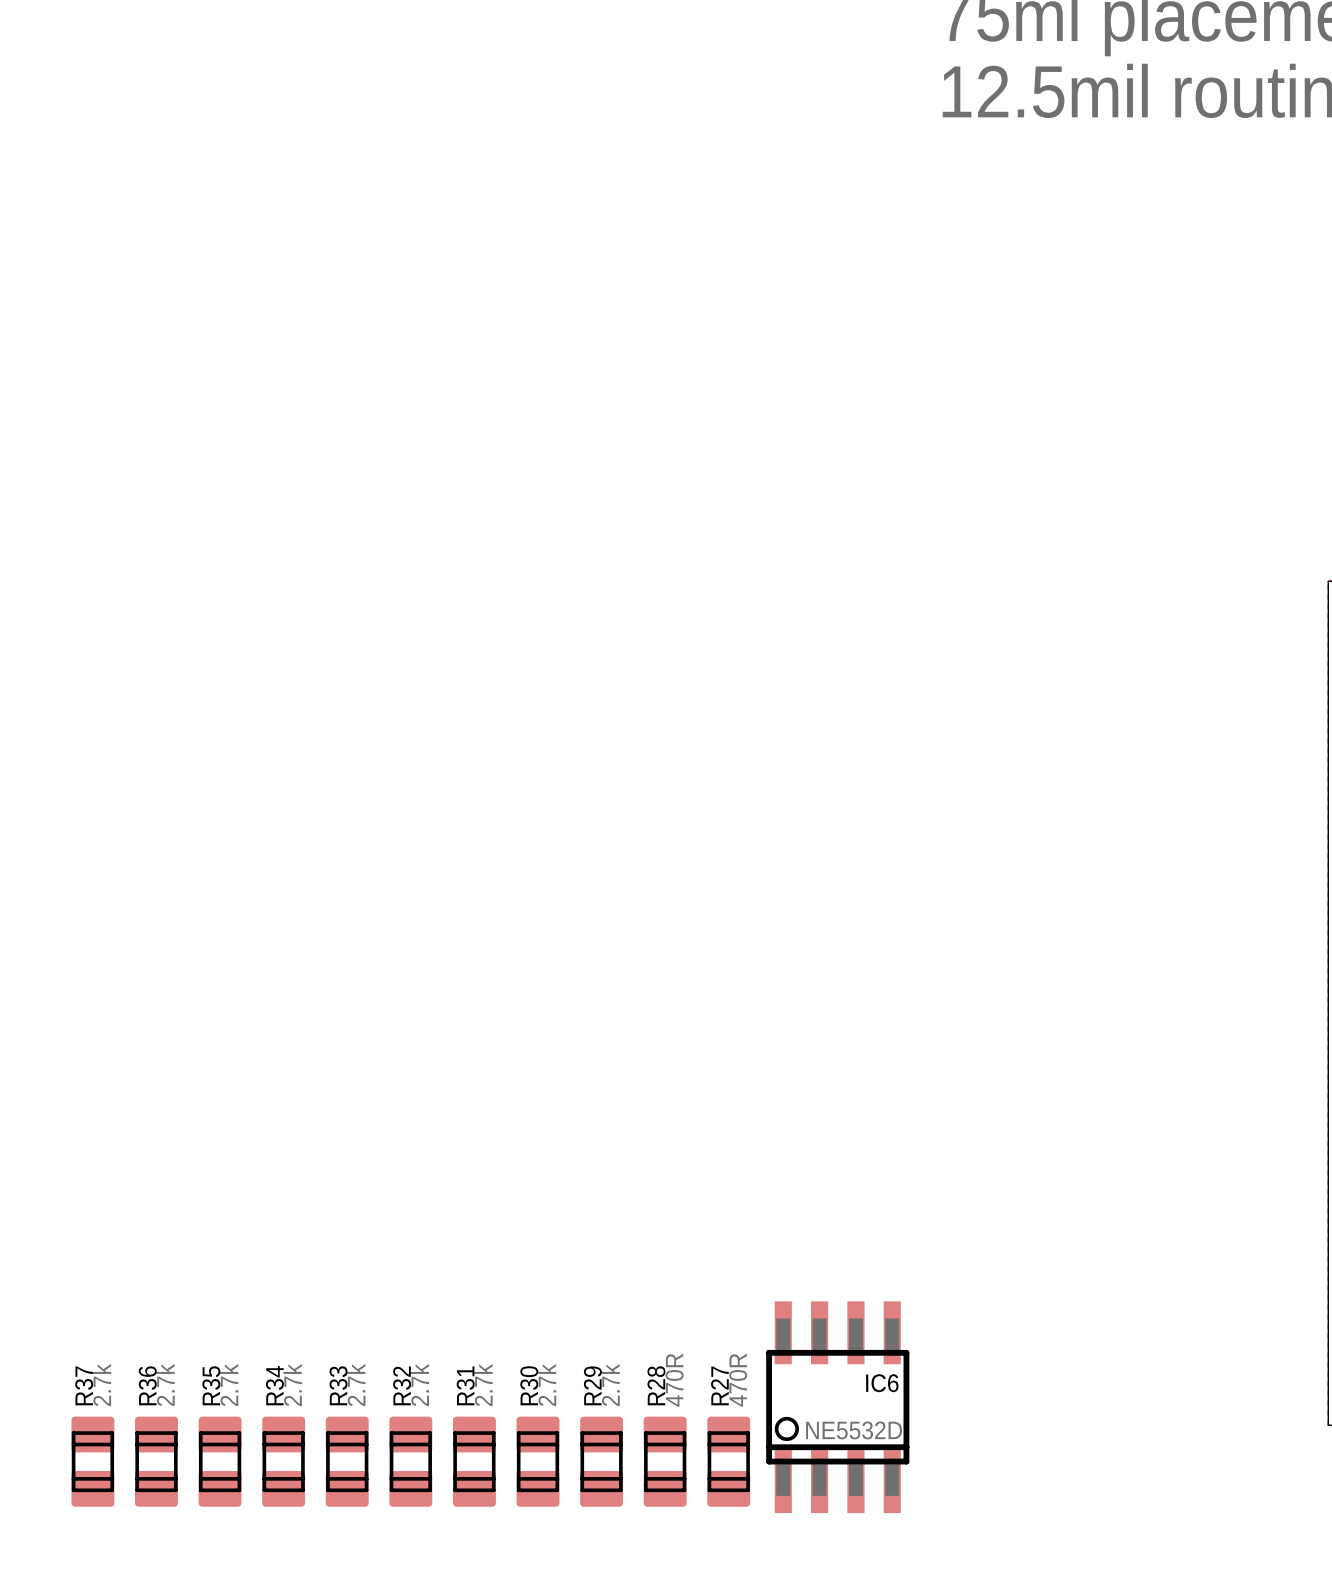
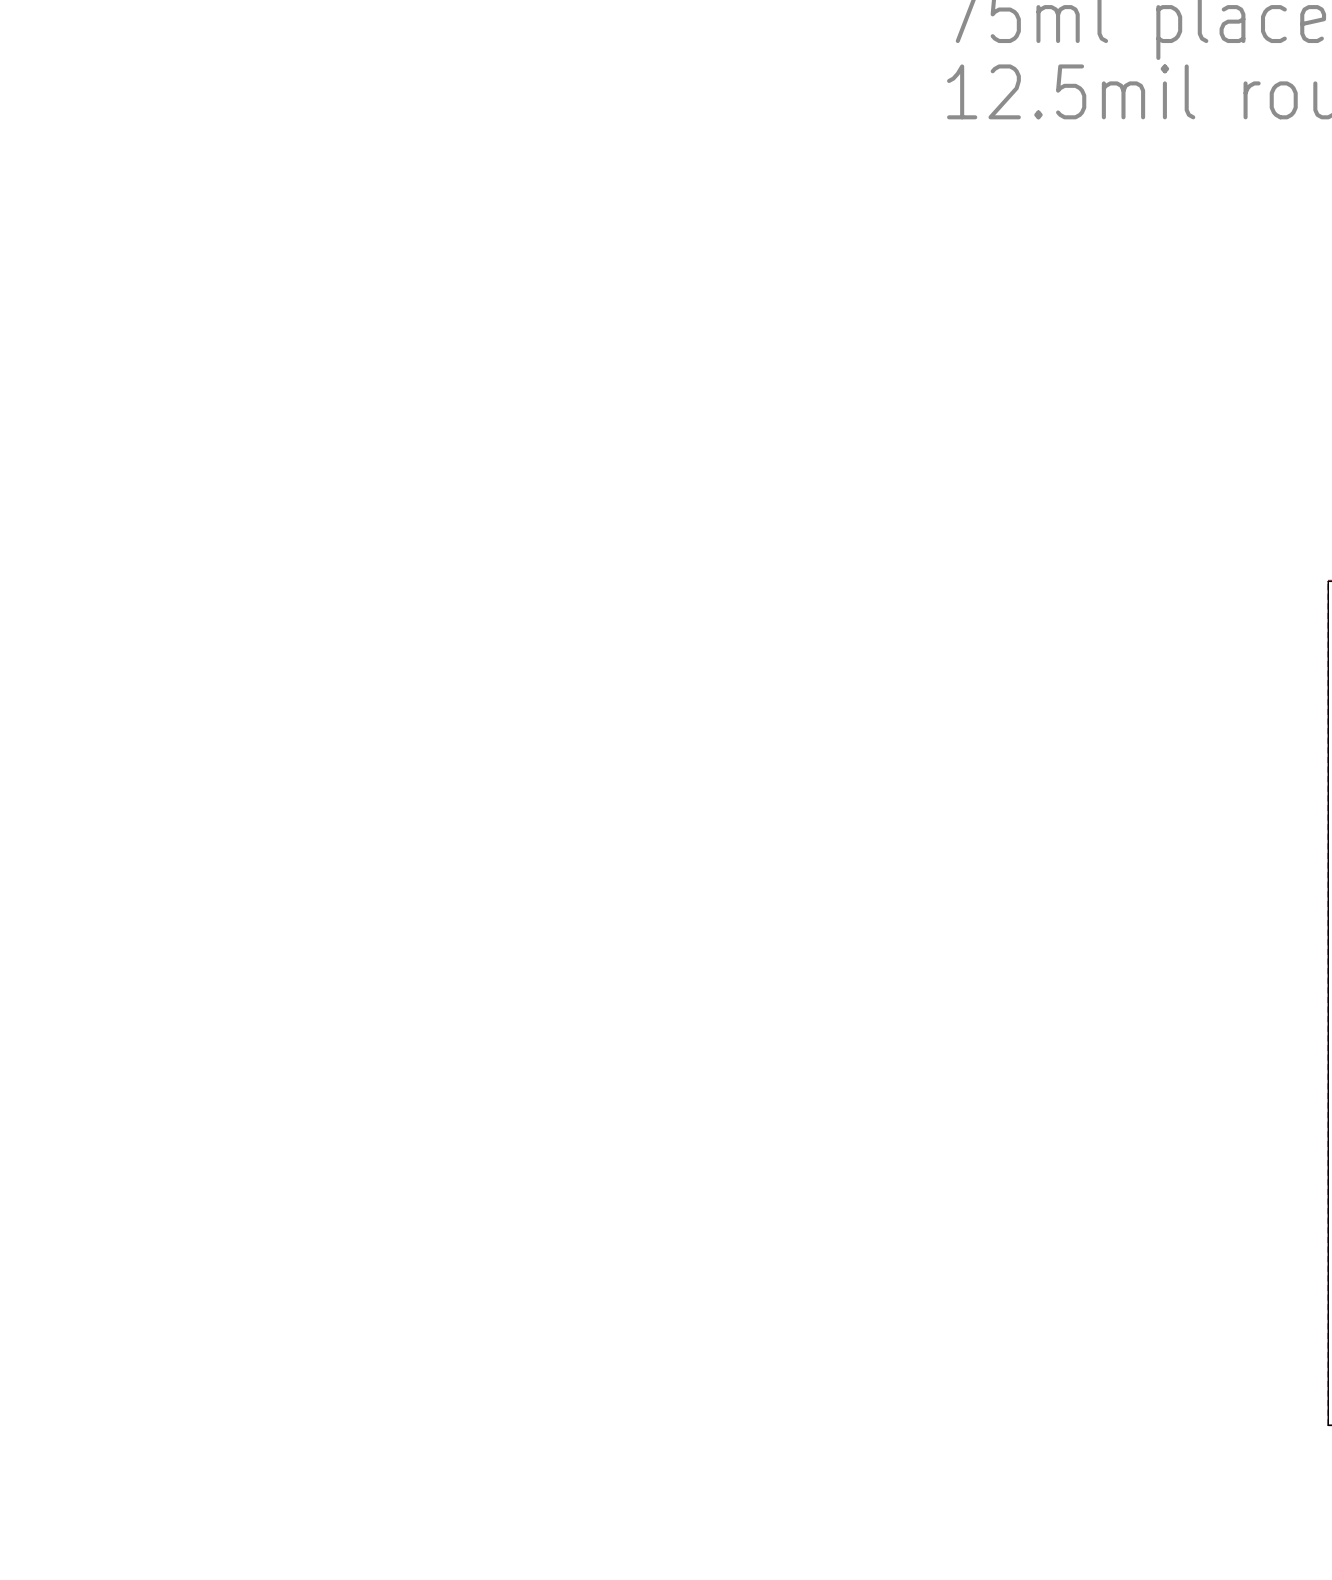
IC6: NE5532D (837, 1407) -> none
R37: 2.7k (92, 1461) -> none
R36: 2.7k (156, 1461) -> none
R35: 2.7k (220, 1461) -> none
R34: 2.7k (283, 1461) -> none
R33: 2.7k (347, 1461) -> none
R32: 2.7k (410, 1461) -> none
R31: 2.7k (474, 1461) -> none
R30: 2.7k (538, 1461) -> none
R29: 2.7k (601, 1461) -> none
R28: 470R (665, 1461) -> none
R27: 470R (728, 1461) -> none

